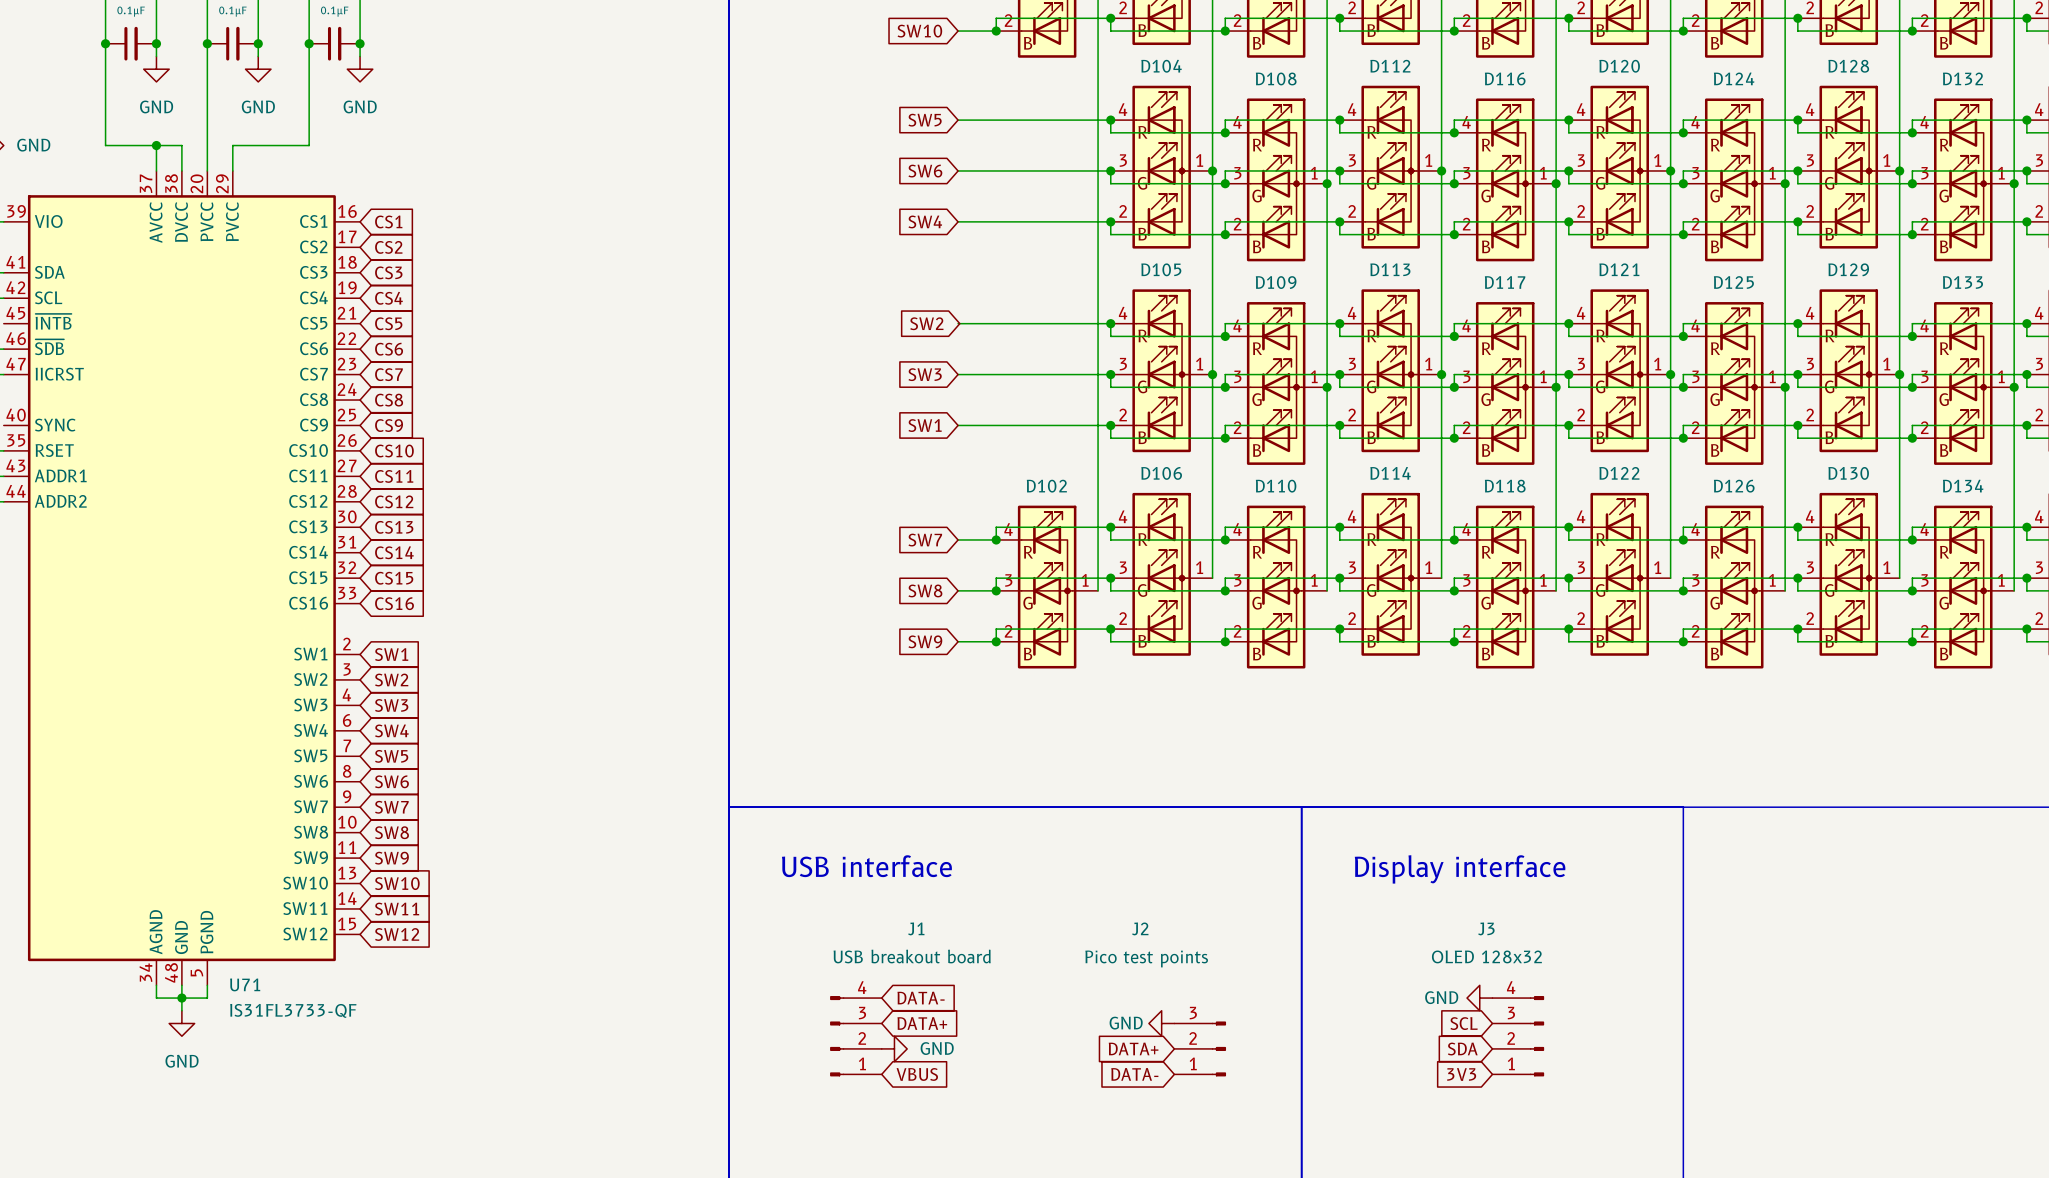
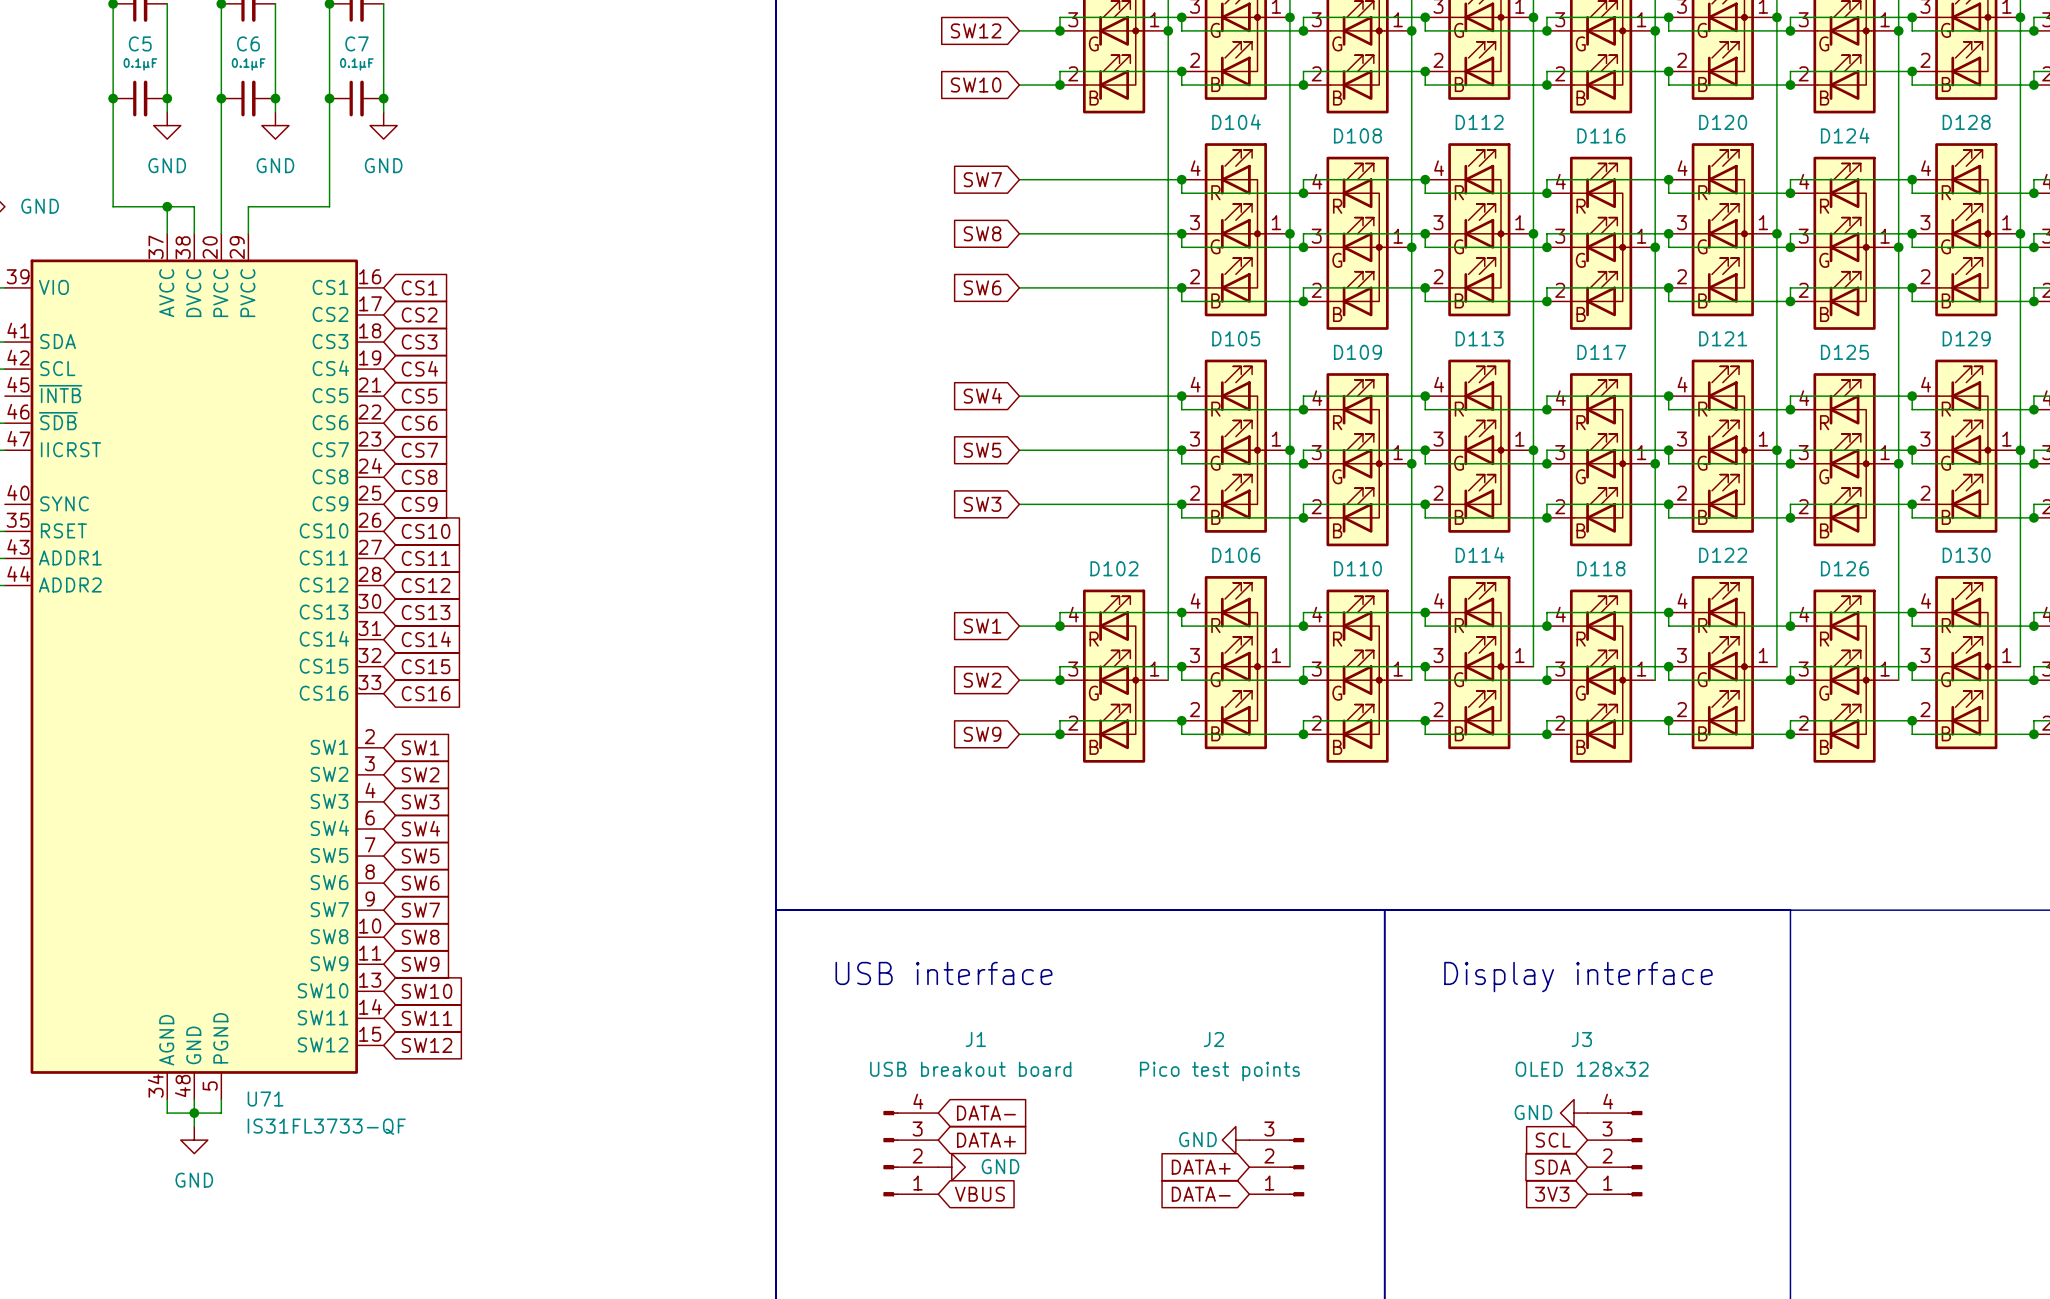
global label: SW5 (925, 120) -> SW7 (982, 179)
global label: SW6 (925, 171) -> SW8 (982, 233)
global label: SW4 (925, 221) -> SW6 (982, 287)
global label: SW2 (926, 323) -> SW4 (982, 395)
global label: SW3 (925, 374) -> SW5 (982, 450)
global label: SW1 (925, 425) -> SW3 (982, 504)
global label: SW7 (925, 540) -> SW1 (982, 626)
global label: SW8 (925, 590) -> SW2 (982, 680)

